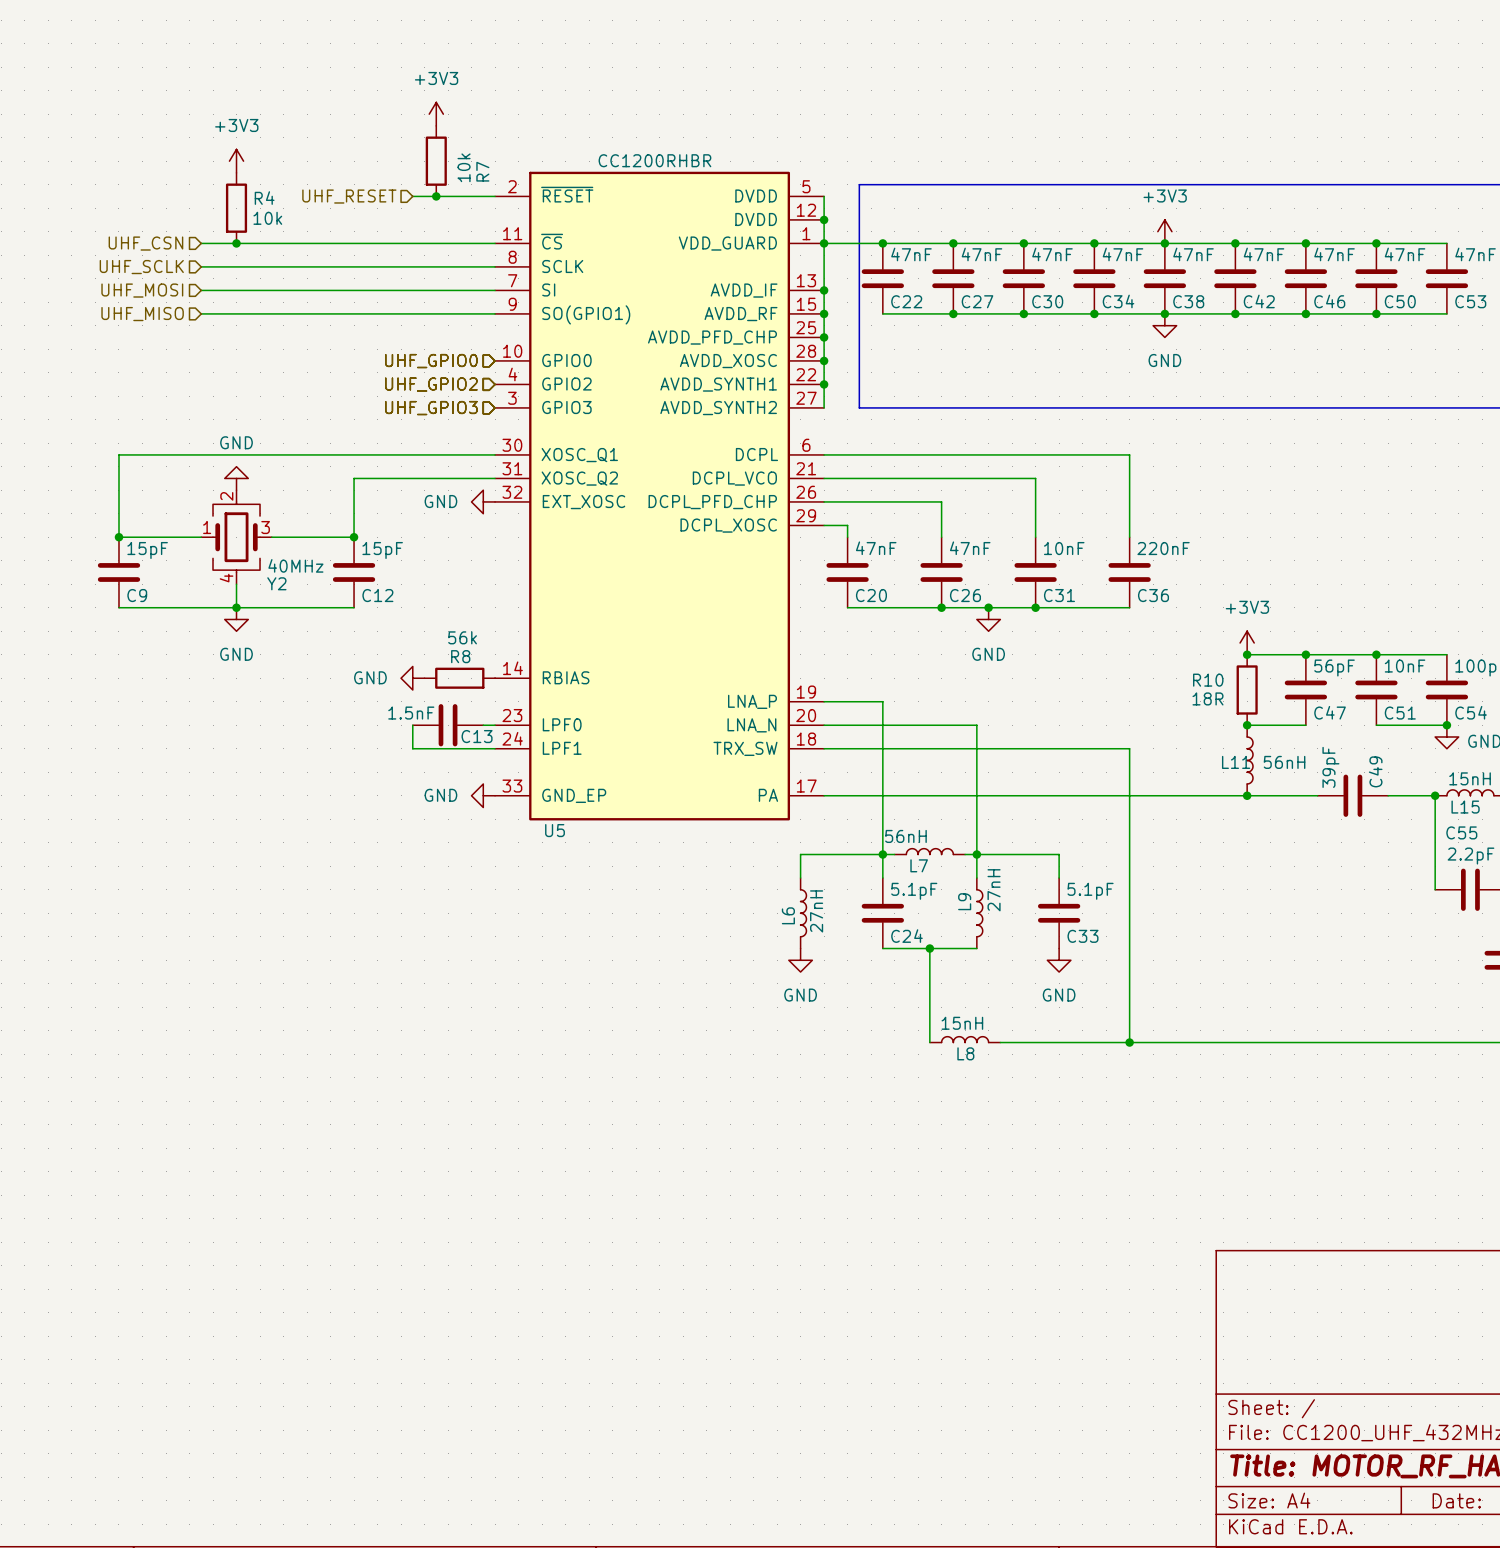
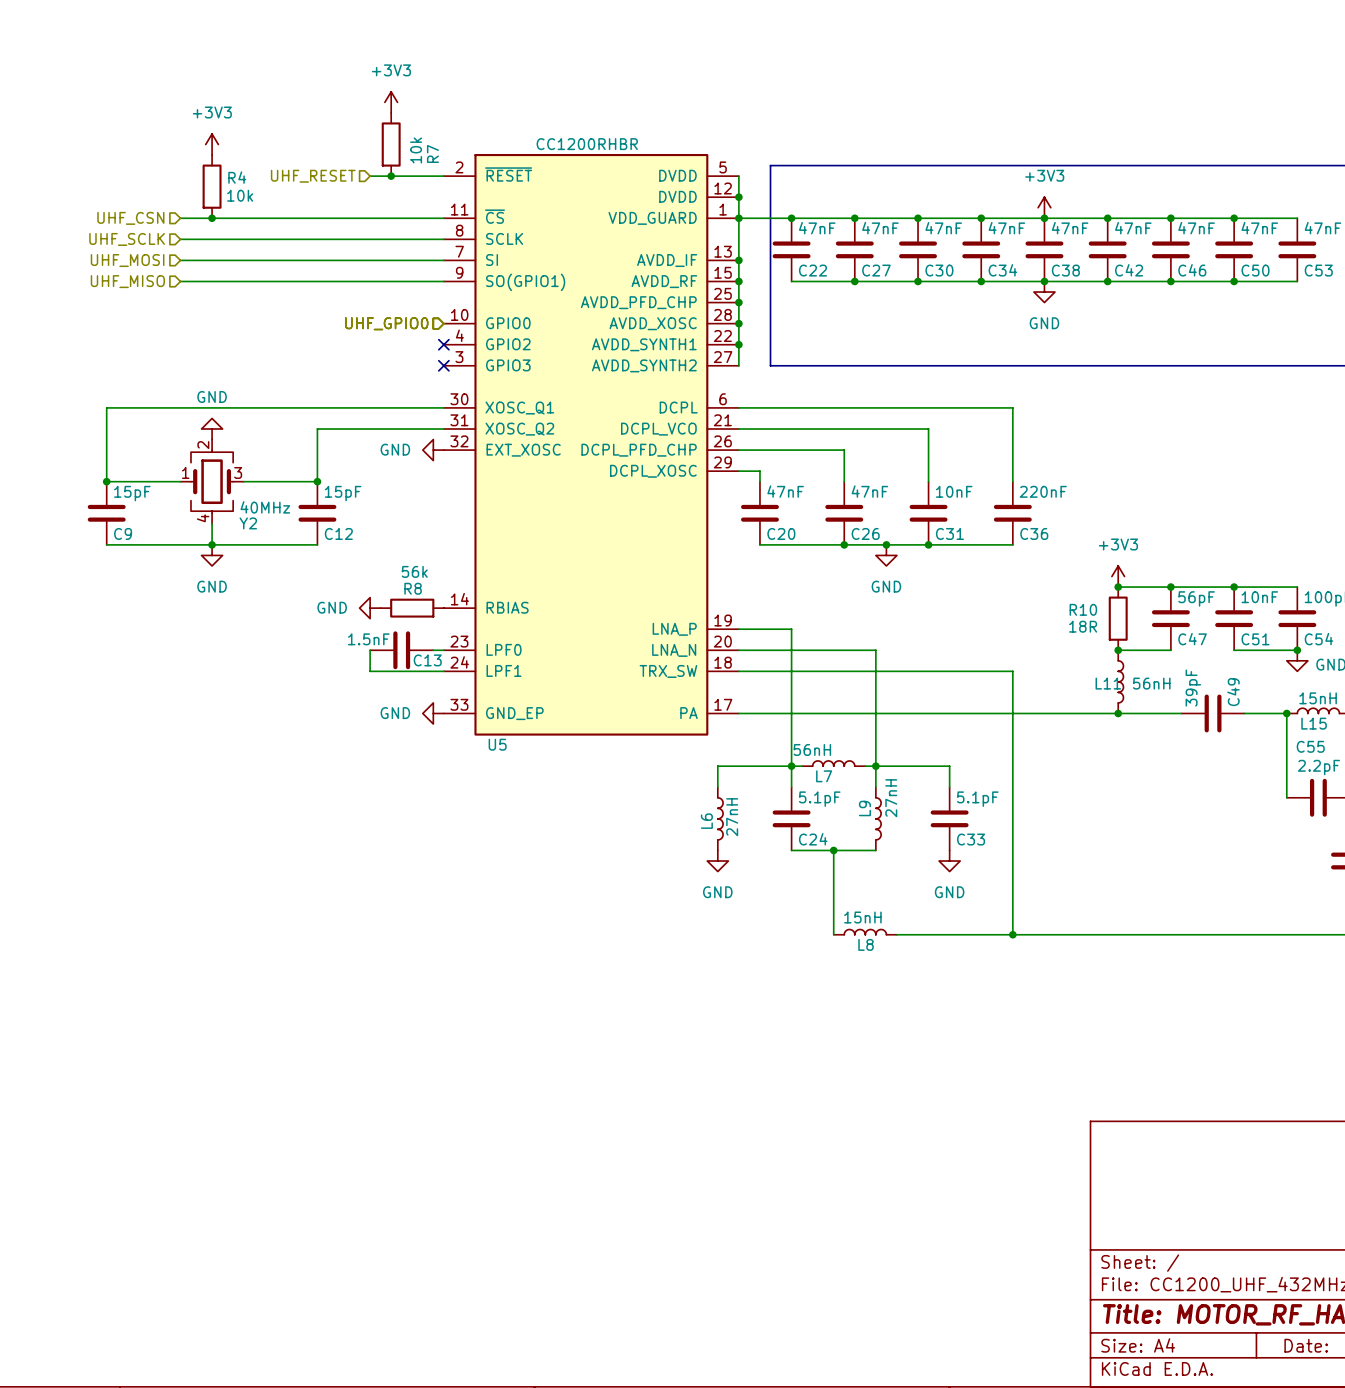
hierarchical label: UHF_GPIO2 (431, 384) -> none
no-connect mark: none -> (443, 344)
no-connect mark: none -> (443, 365)
hierarchical label: UHF_GPIO3 (431, 408) -> none

